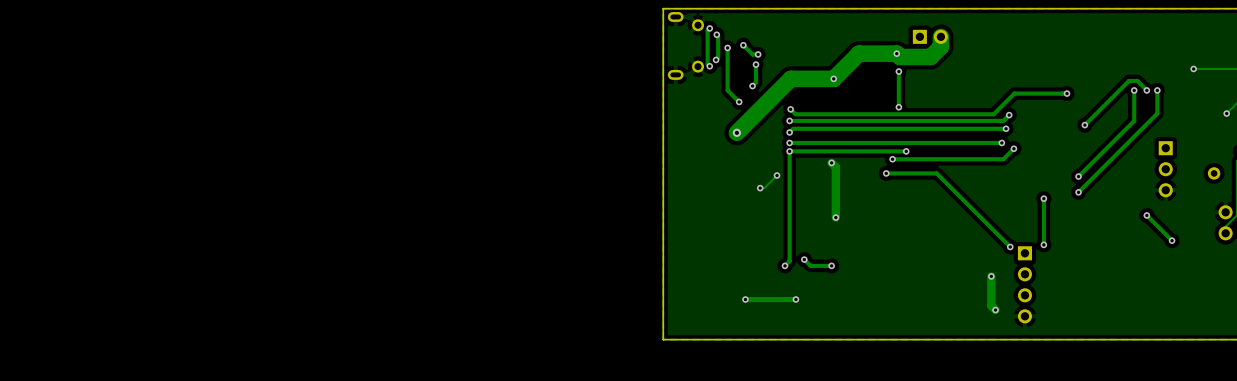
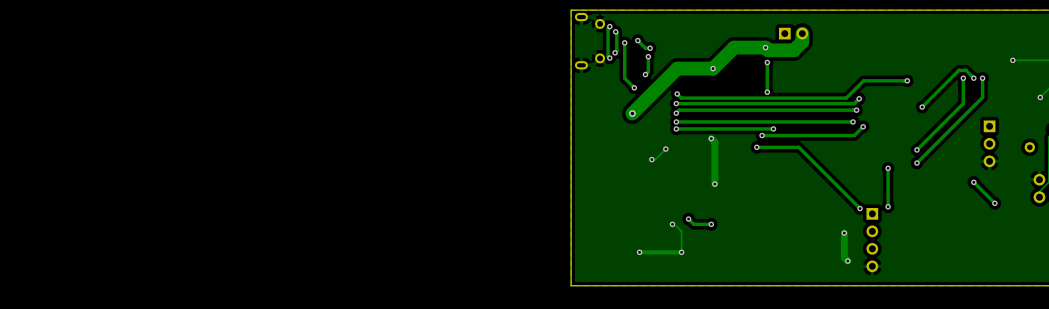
track: (789, 151) (789, 261) (785, 265) -> none
track: none -> (676, 226) (681, 231) (681, 252)

